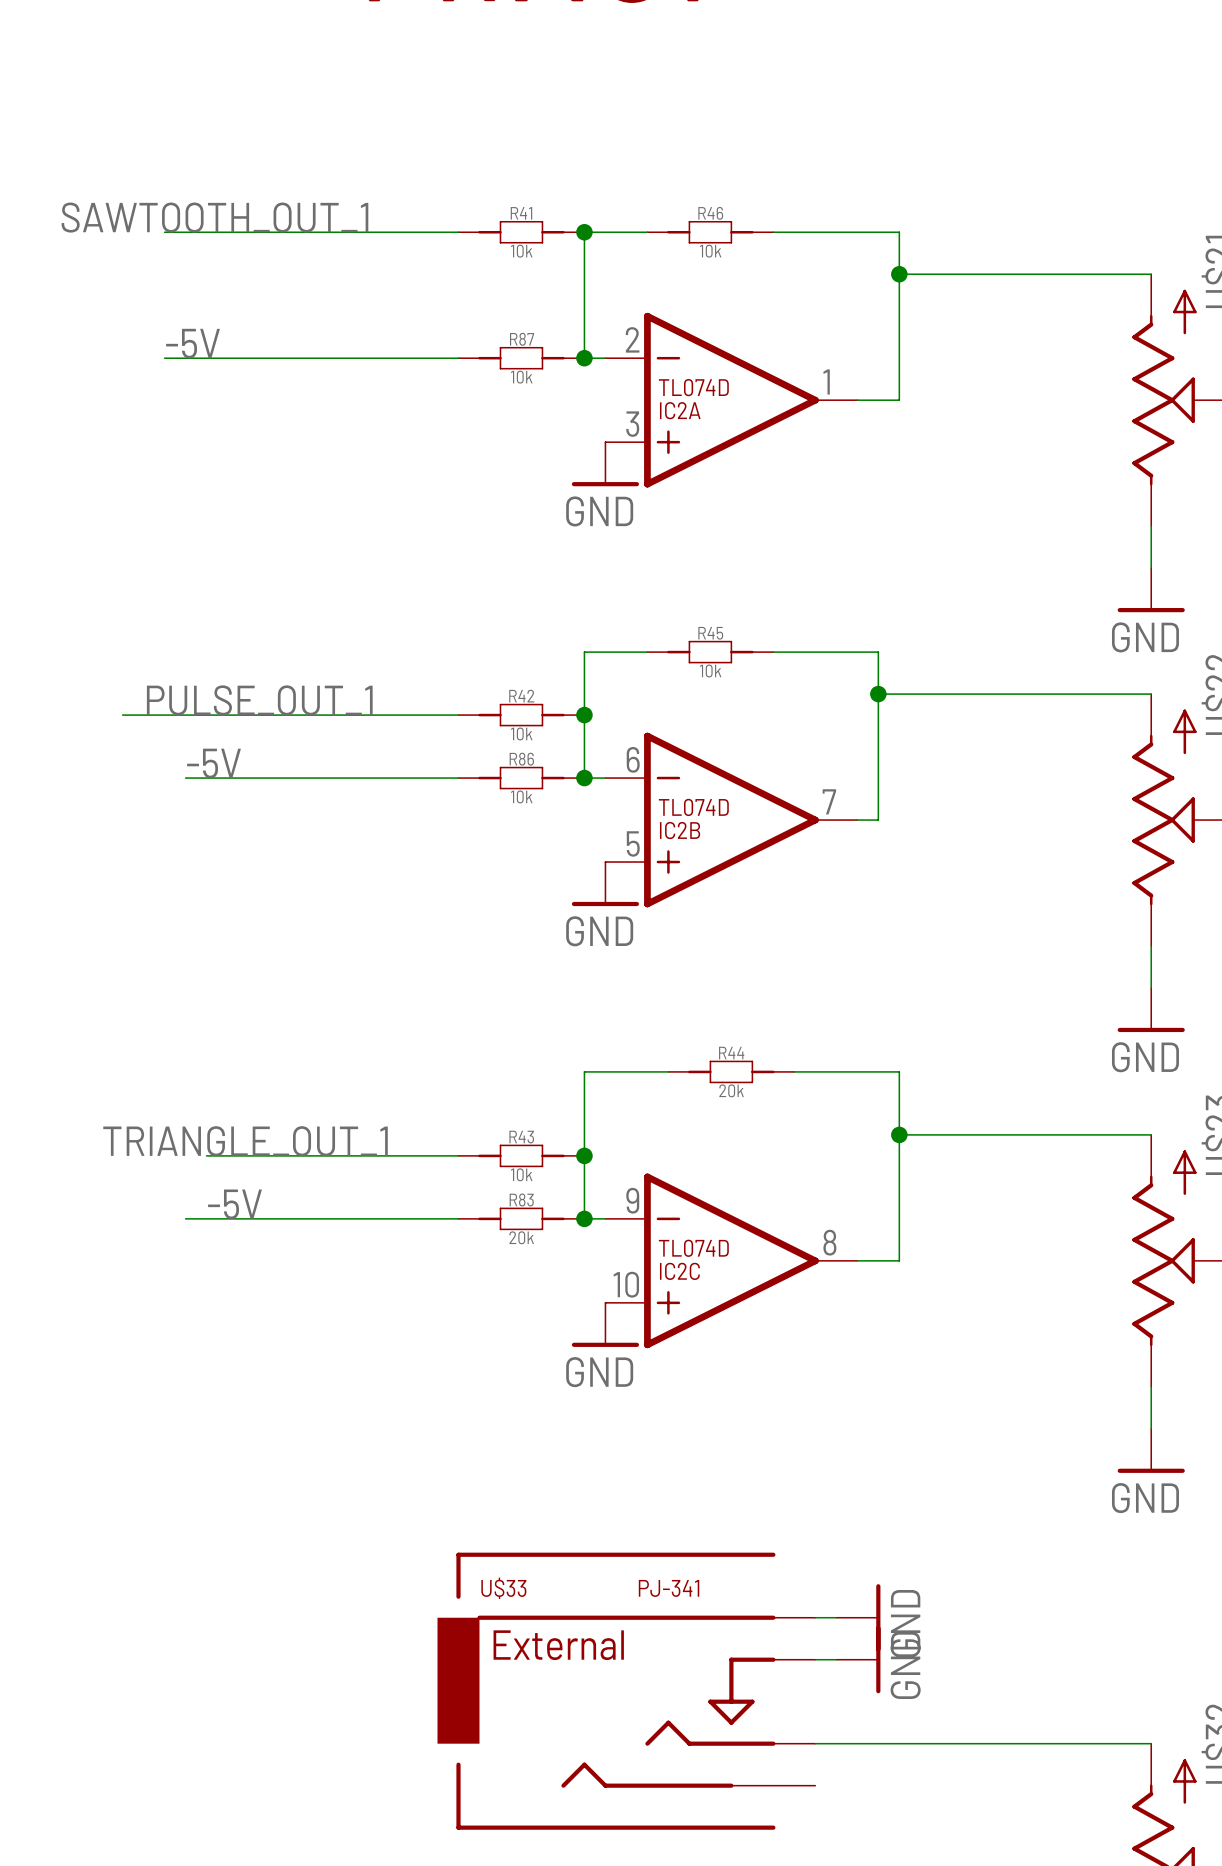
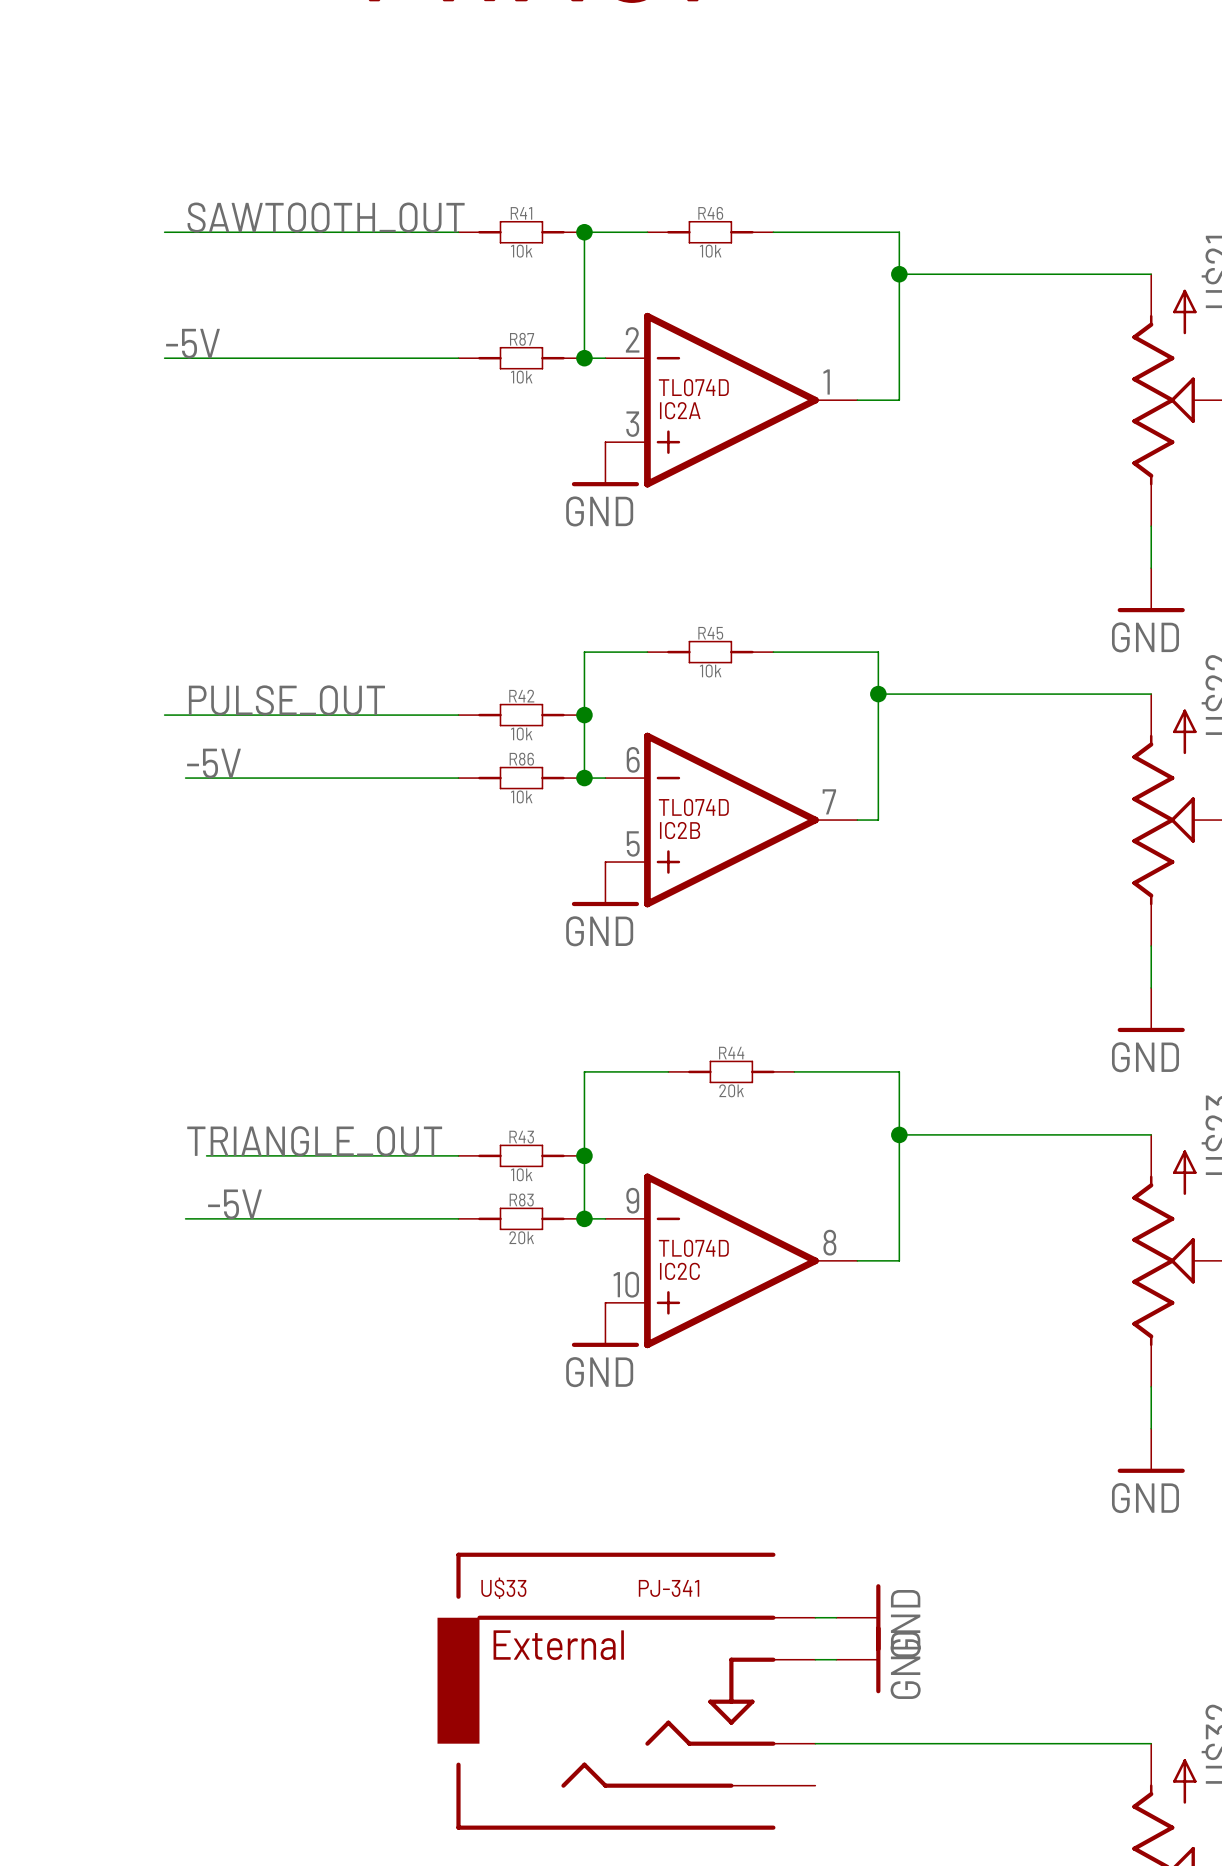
label: SAWTOOTH_OUT_1 (214, 217) -> SAWTOOTH_OUT (326, 217)
label: PULSE_OUT_1 (259, 700) -> PULSE_OUT (286, 700)
wire: (122, 715) (164, 715) -> none
label: TRIANGLE_OUT_1 (245, 1141) -> TRIANGLE_OUT (314, 1141)

